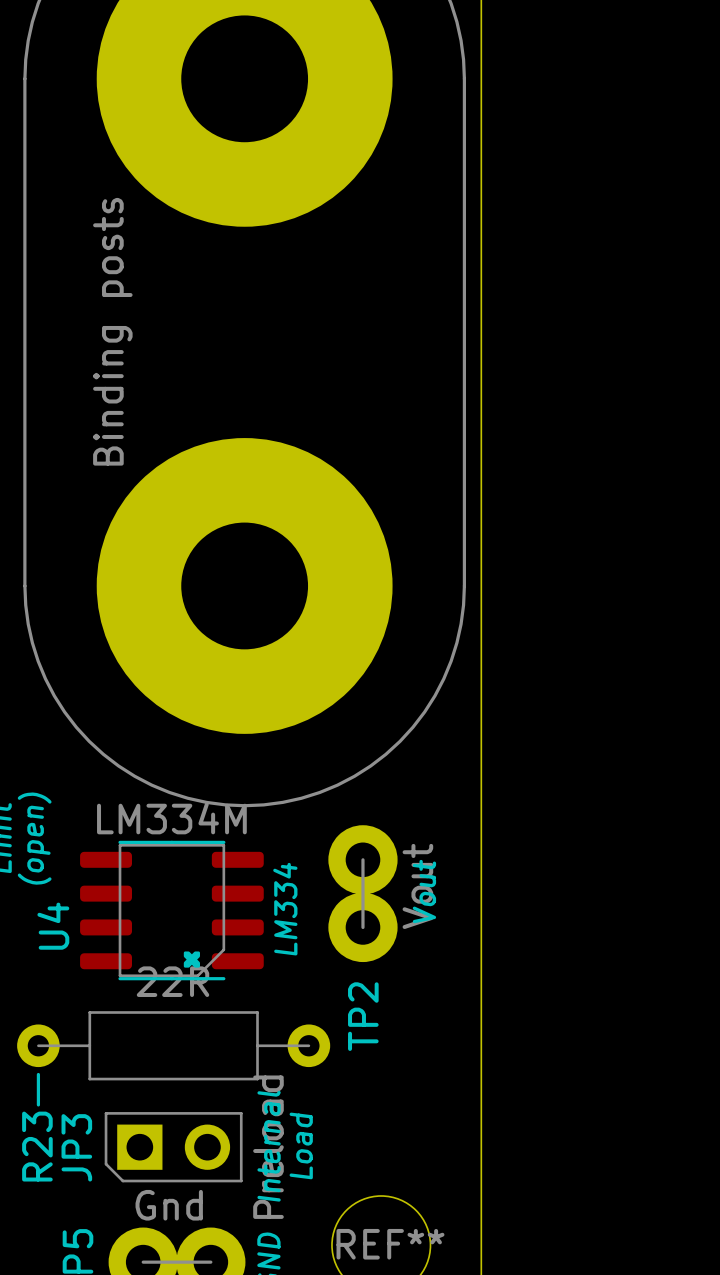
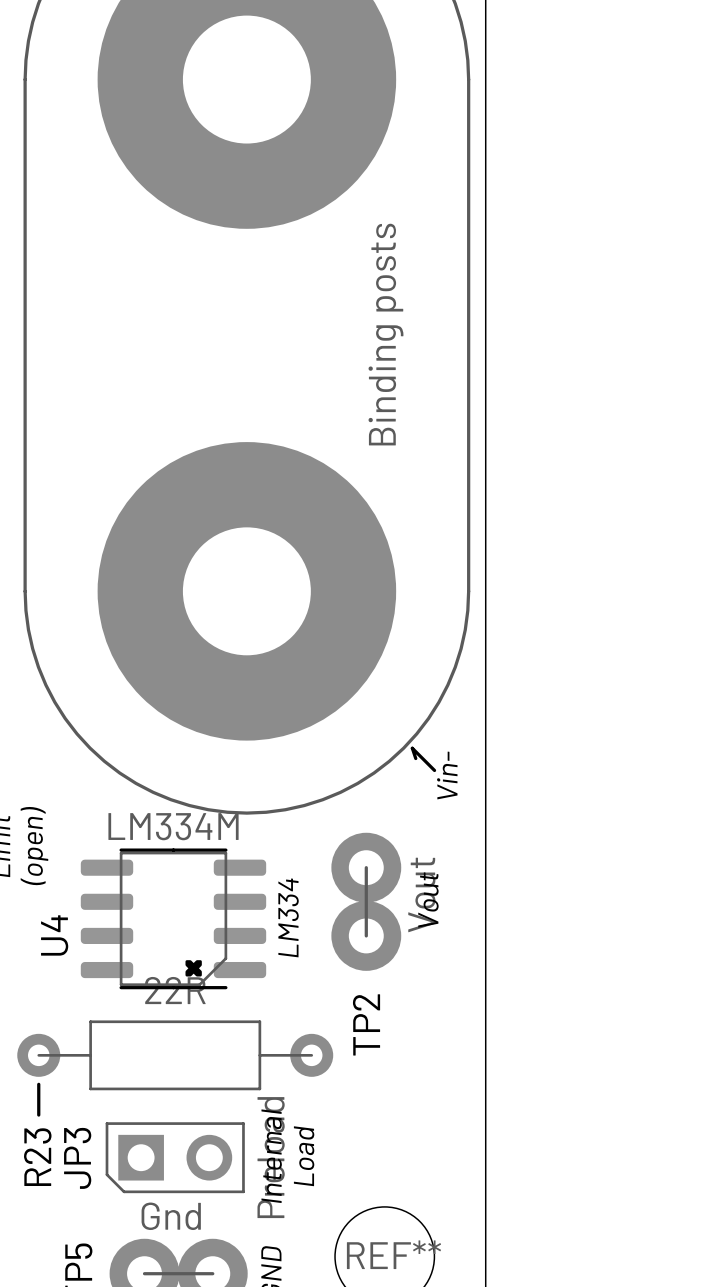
part value position: Binding posts (112, 331) -> Binding posts (385, 334)
line: none -> (415, 758) (412, 748) (434, 770)
text: none -> Vin- (447, 775)

